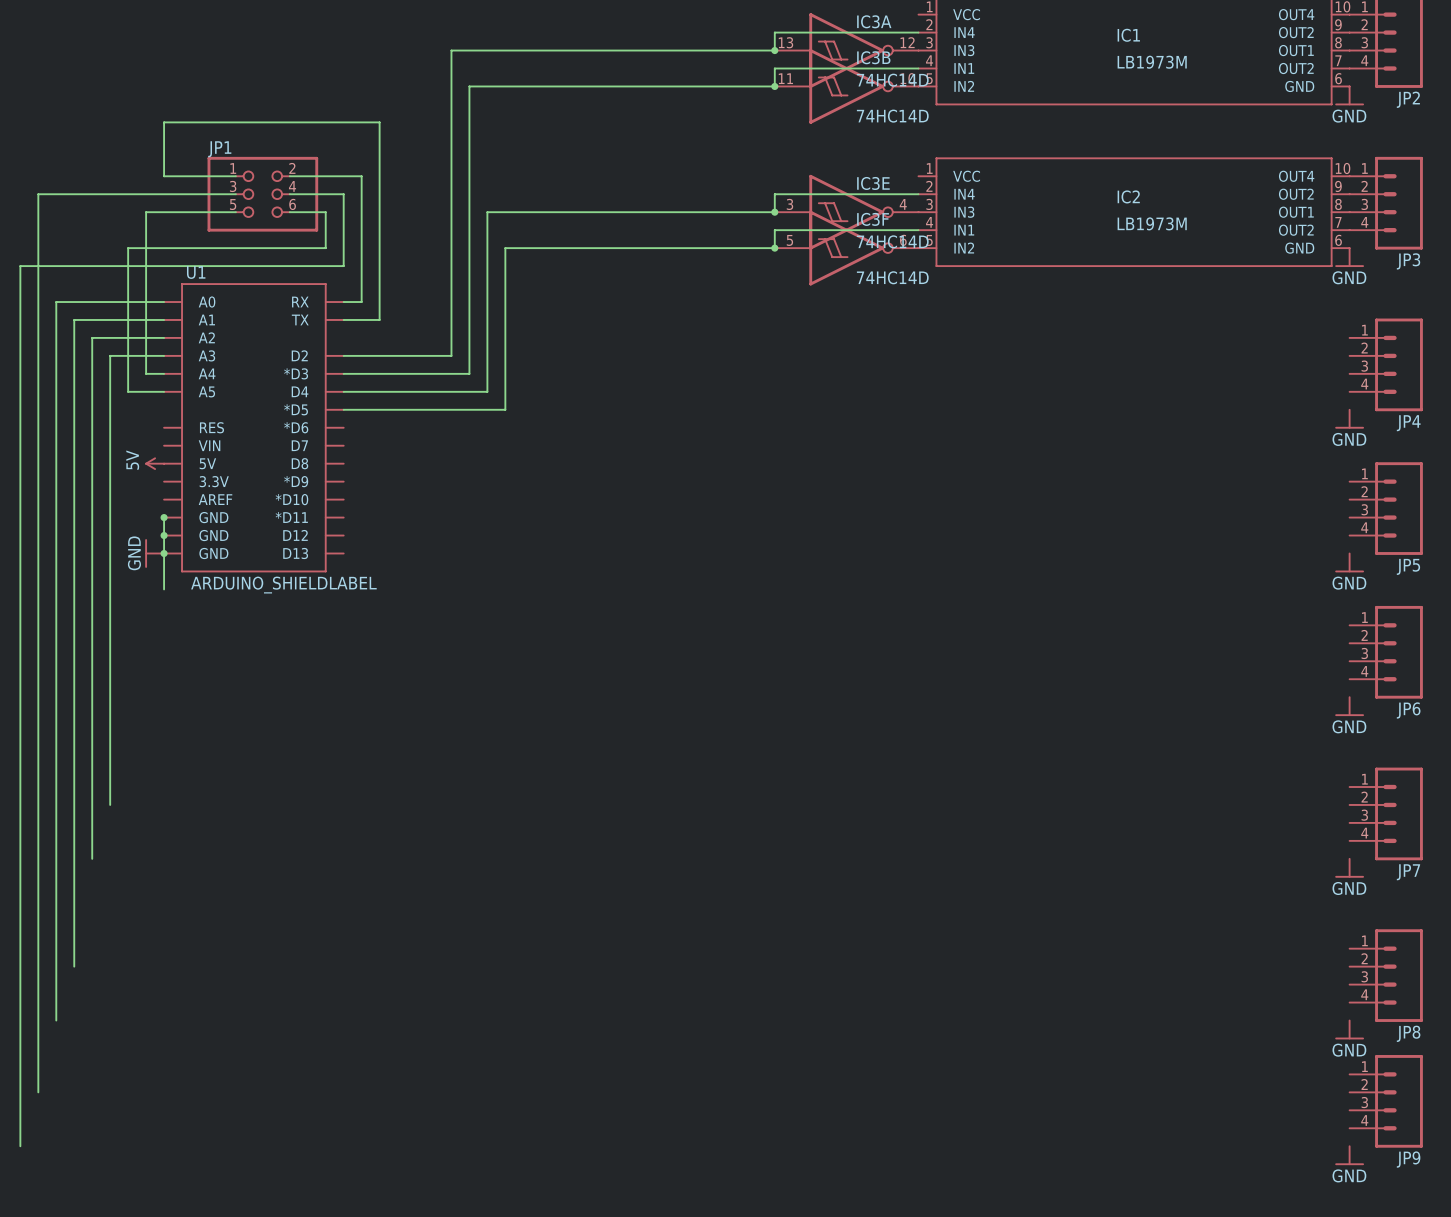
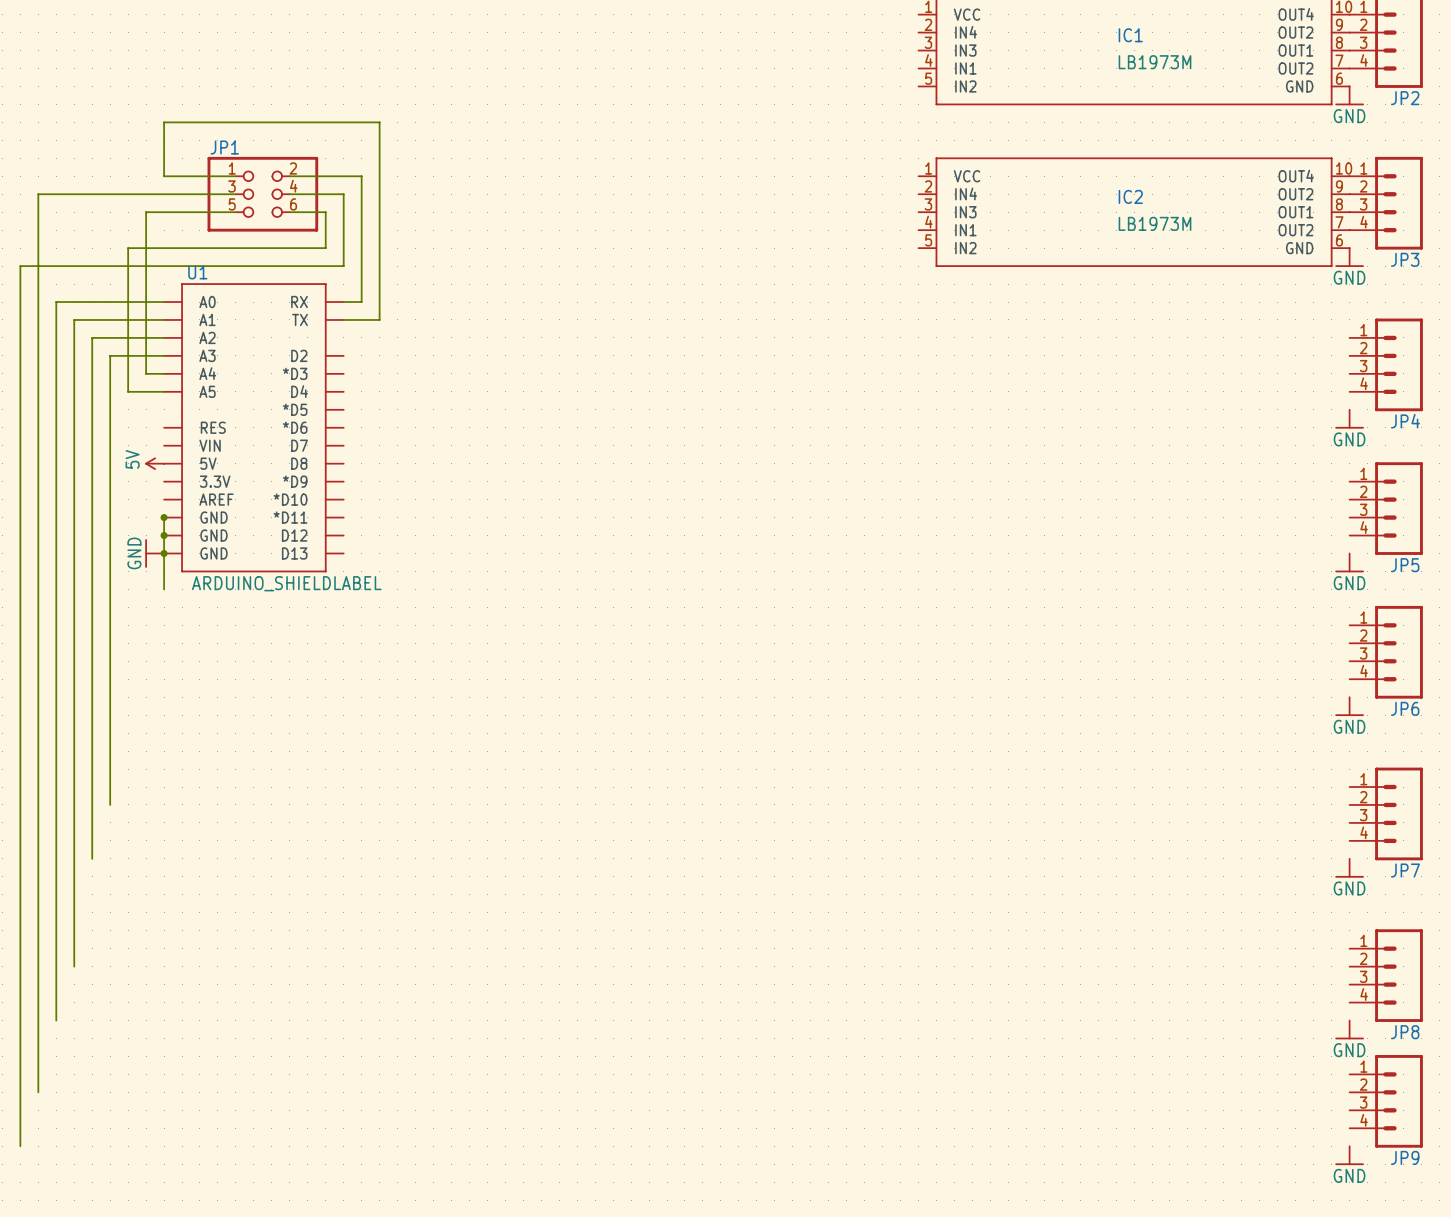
wire: (918, 32) (774, 32) (774, 50) (451, 50) (451, 355) (343, 355) -> none
junction: (774, 50) -> none
IC3A: 74HC14D (846, 50) -> none
wire: (918, 68) (774, 68) (774, 86) (469, 86) (469, 373) (343, 373) -> none
junction: (774, 86) -> none
IC3B: 74HC14D (846, 86) -> none
wire: (918, 194) (774, 194) (774, 212) (487, 212) (487, 391) (343, 391) -> none
junction: (774, 212) -> none
IC3E: 74HC14D (846, 212) -> none
wire: (918, 230) (774, 230) (774, 248) (505, 248) (505, 409) (343, 409) -> none
junction: (774, 248) -> none
IC3F: 74HC14D (846, 248) -> none

